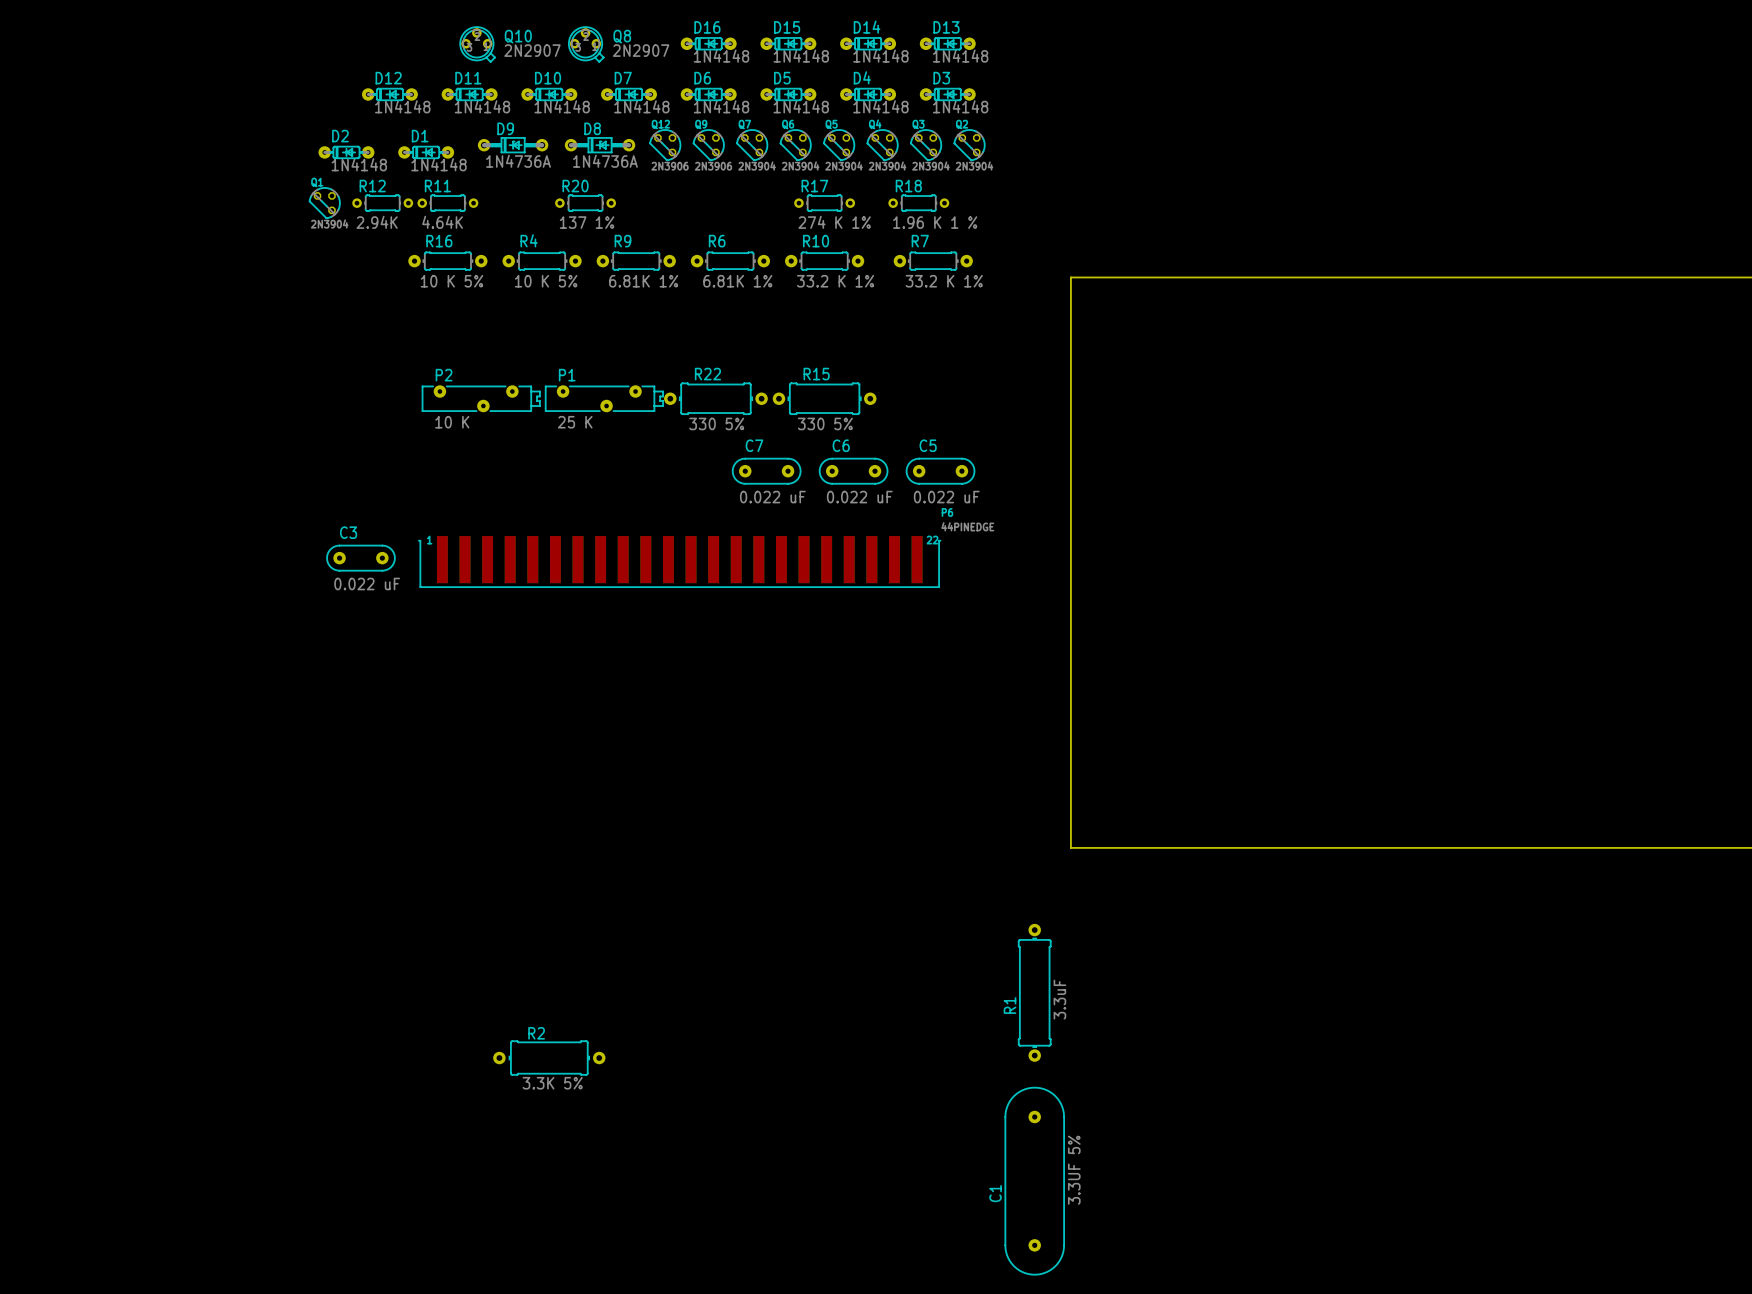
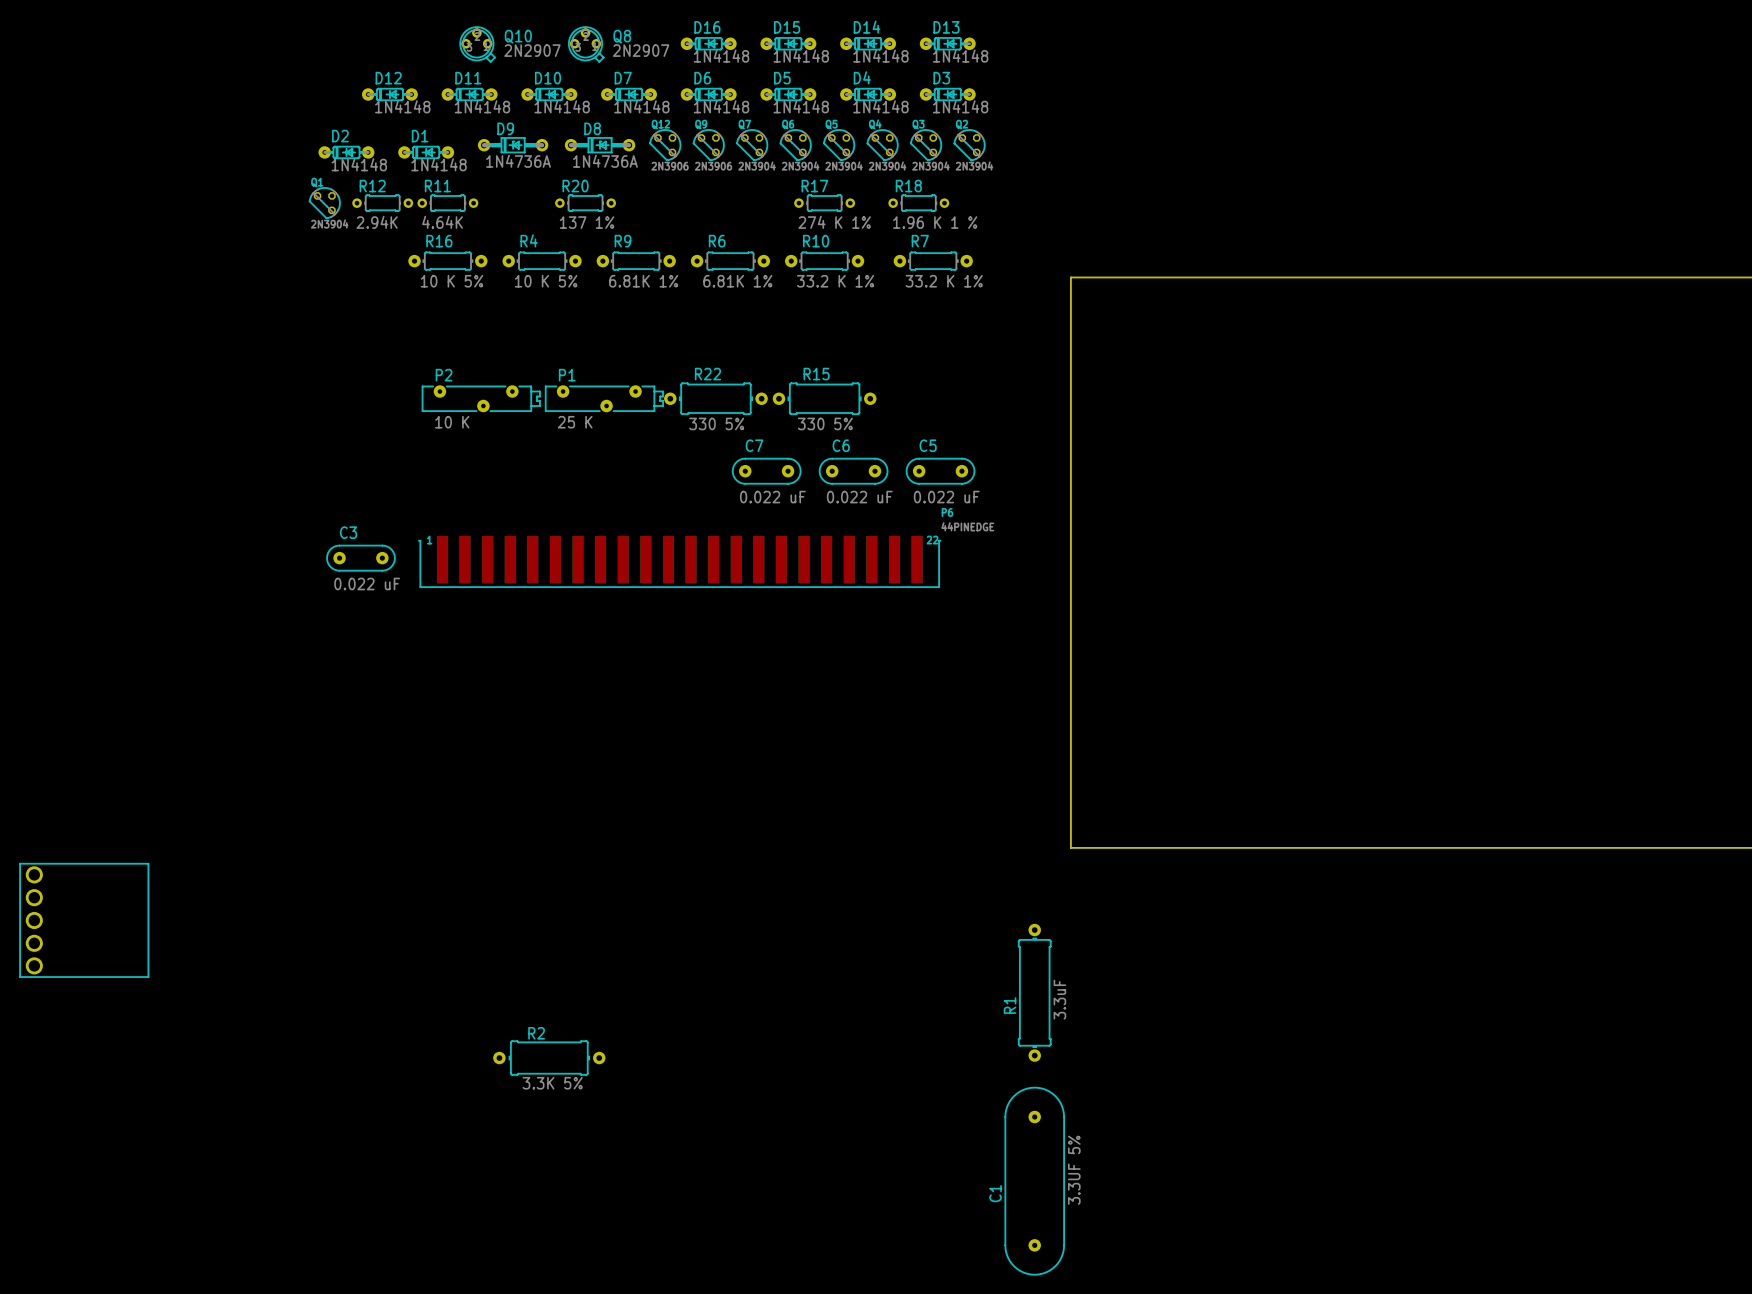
part: none -> (84, 920)

